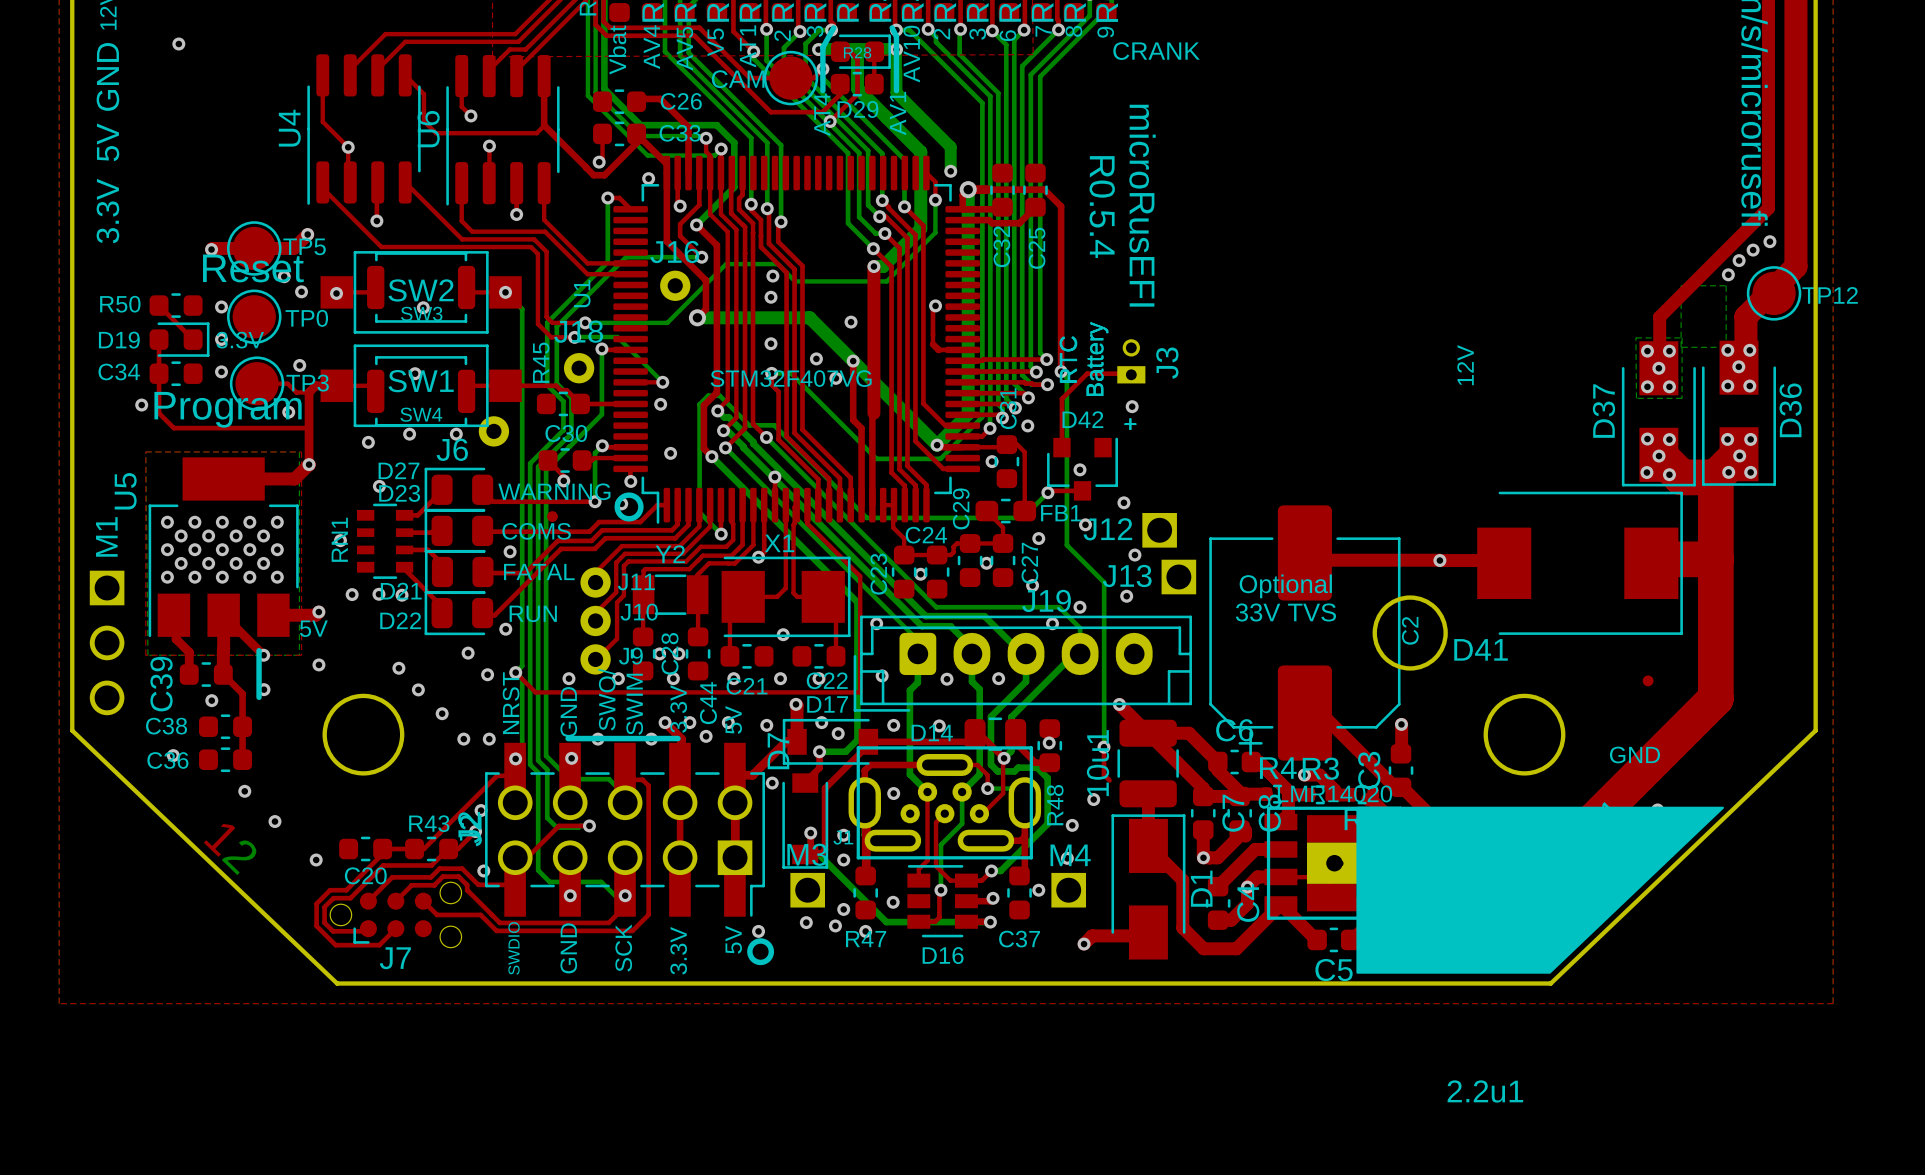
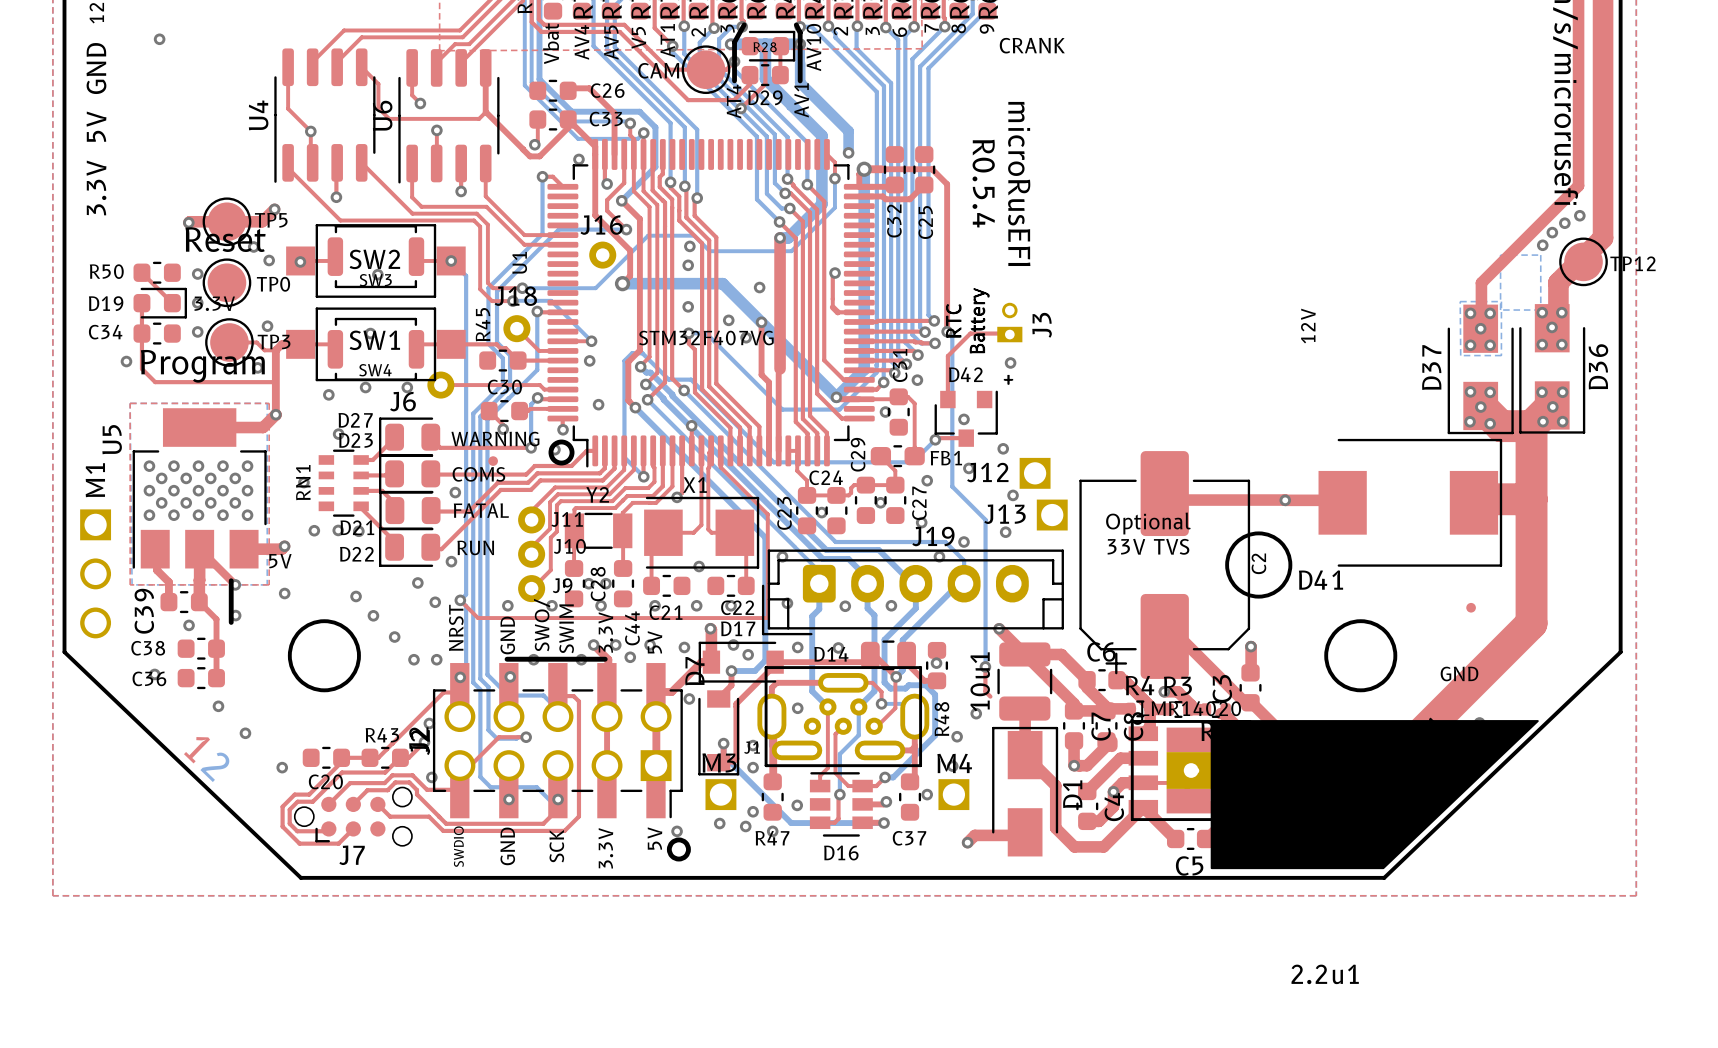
top track: none -> (516, 328) (539, 350) (562, 350)
top track: none -> (440, 385) (539, 385) (544, 389) (562, 389)

